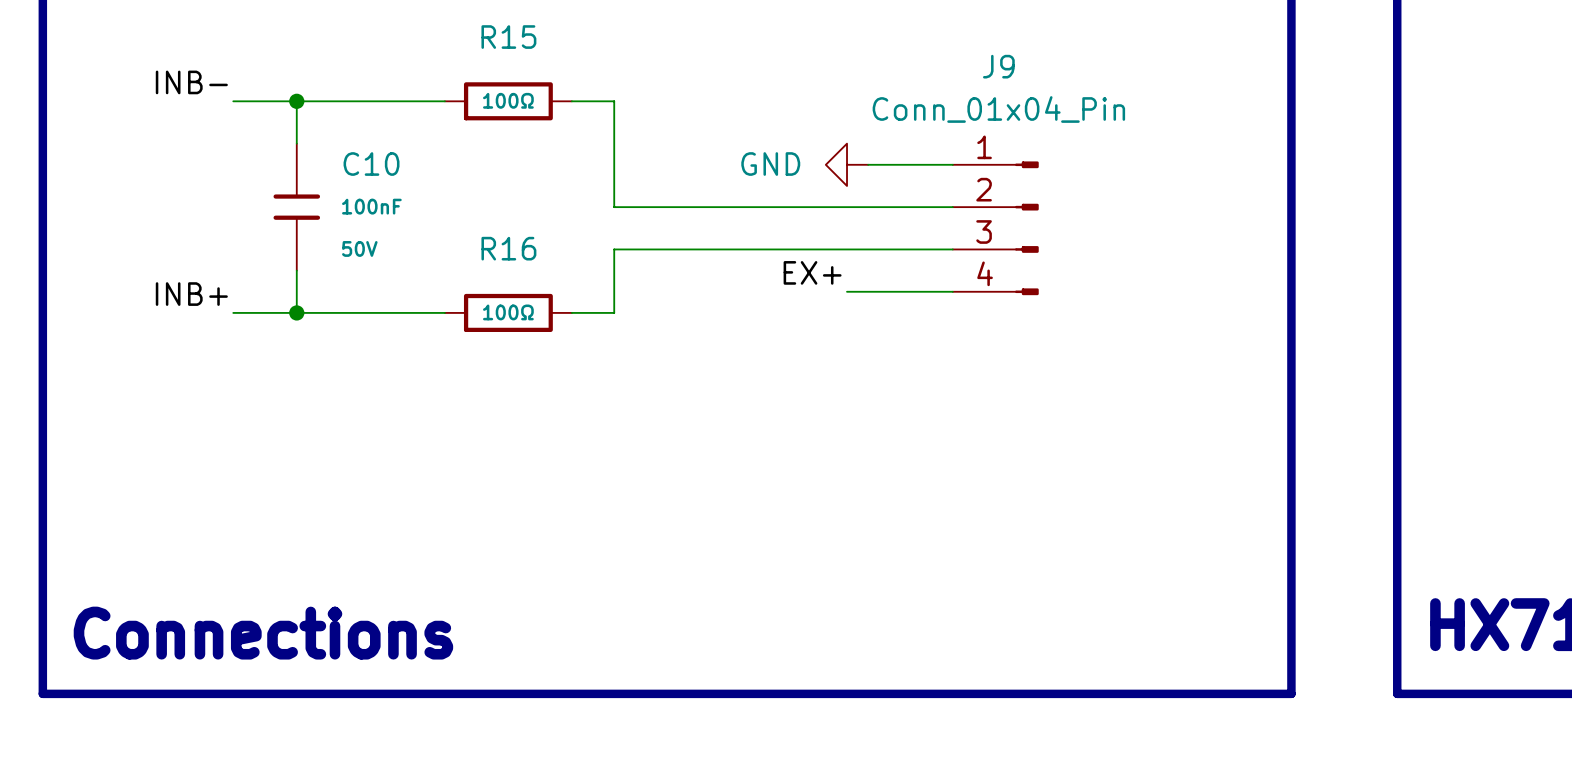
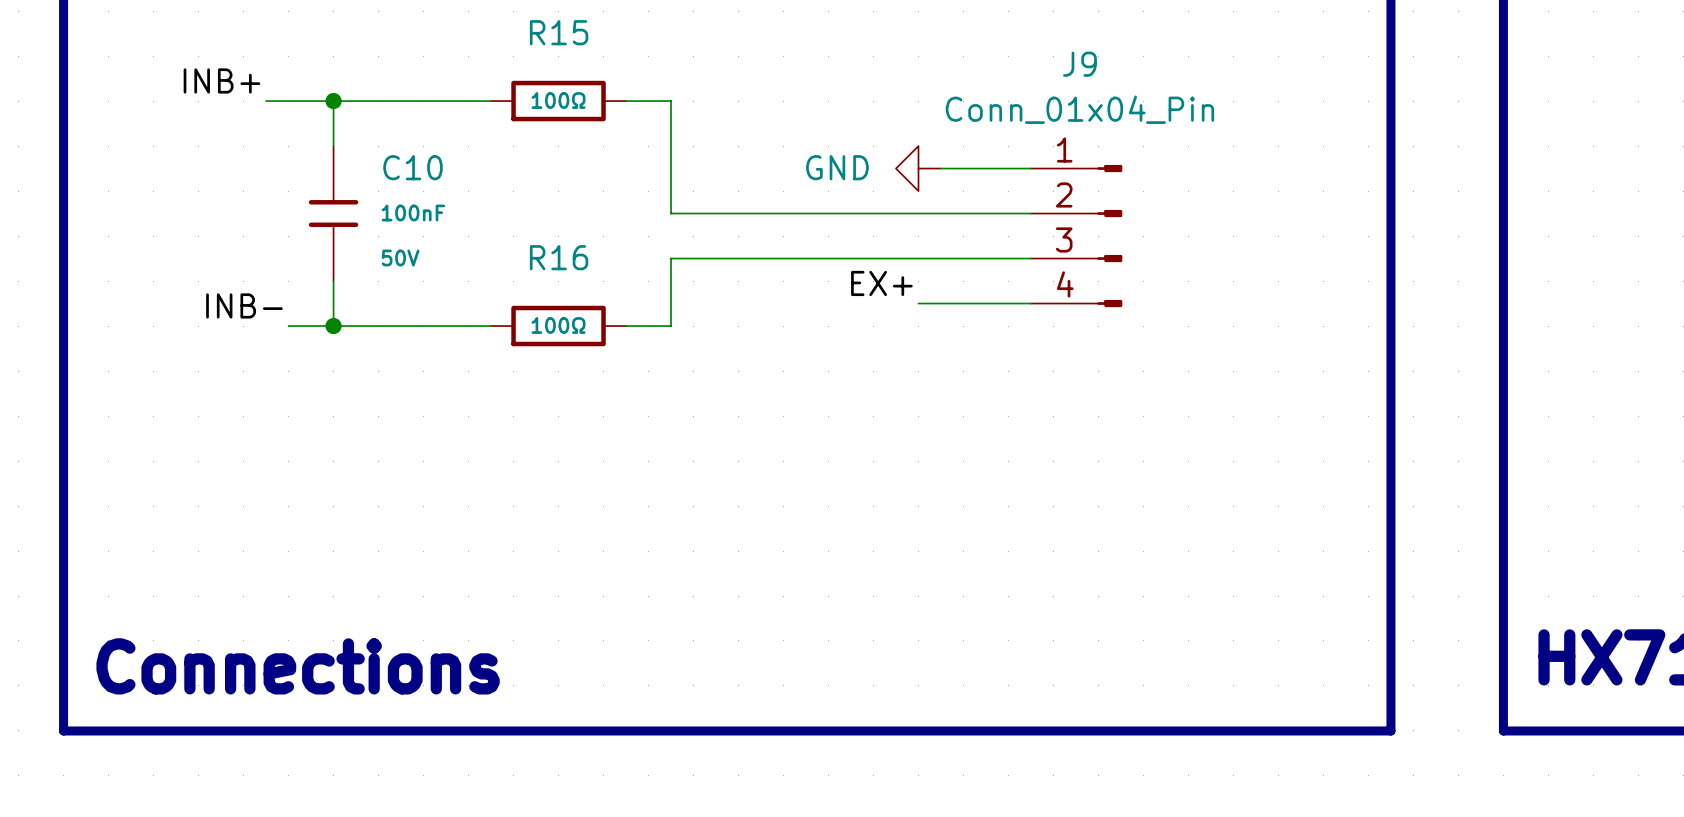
label: INB- (191, 82) -> INB+ (221, 80)
label: INB+ (191, 294) -> INB- (244, 305)
wire: (233, 312) (254, 312) -> none

